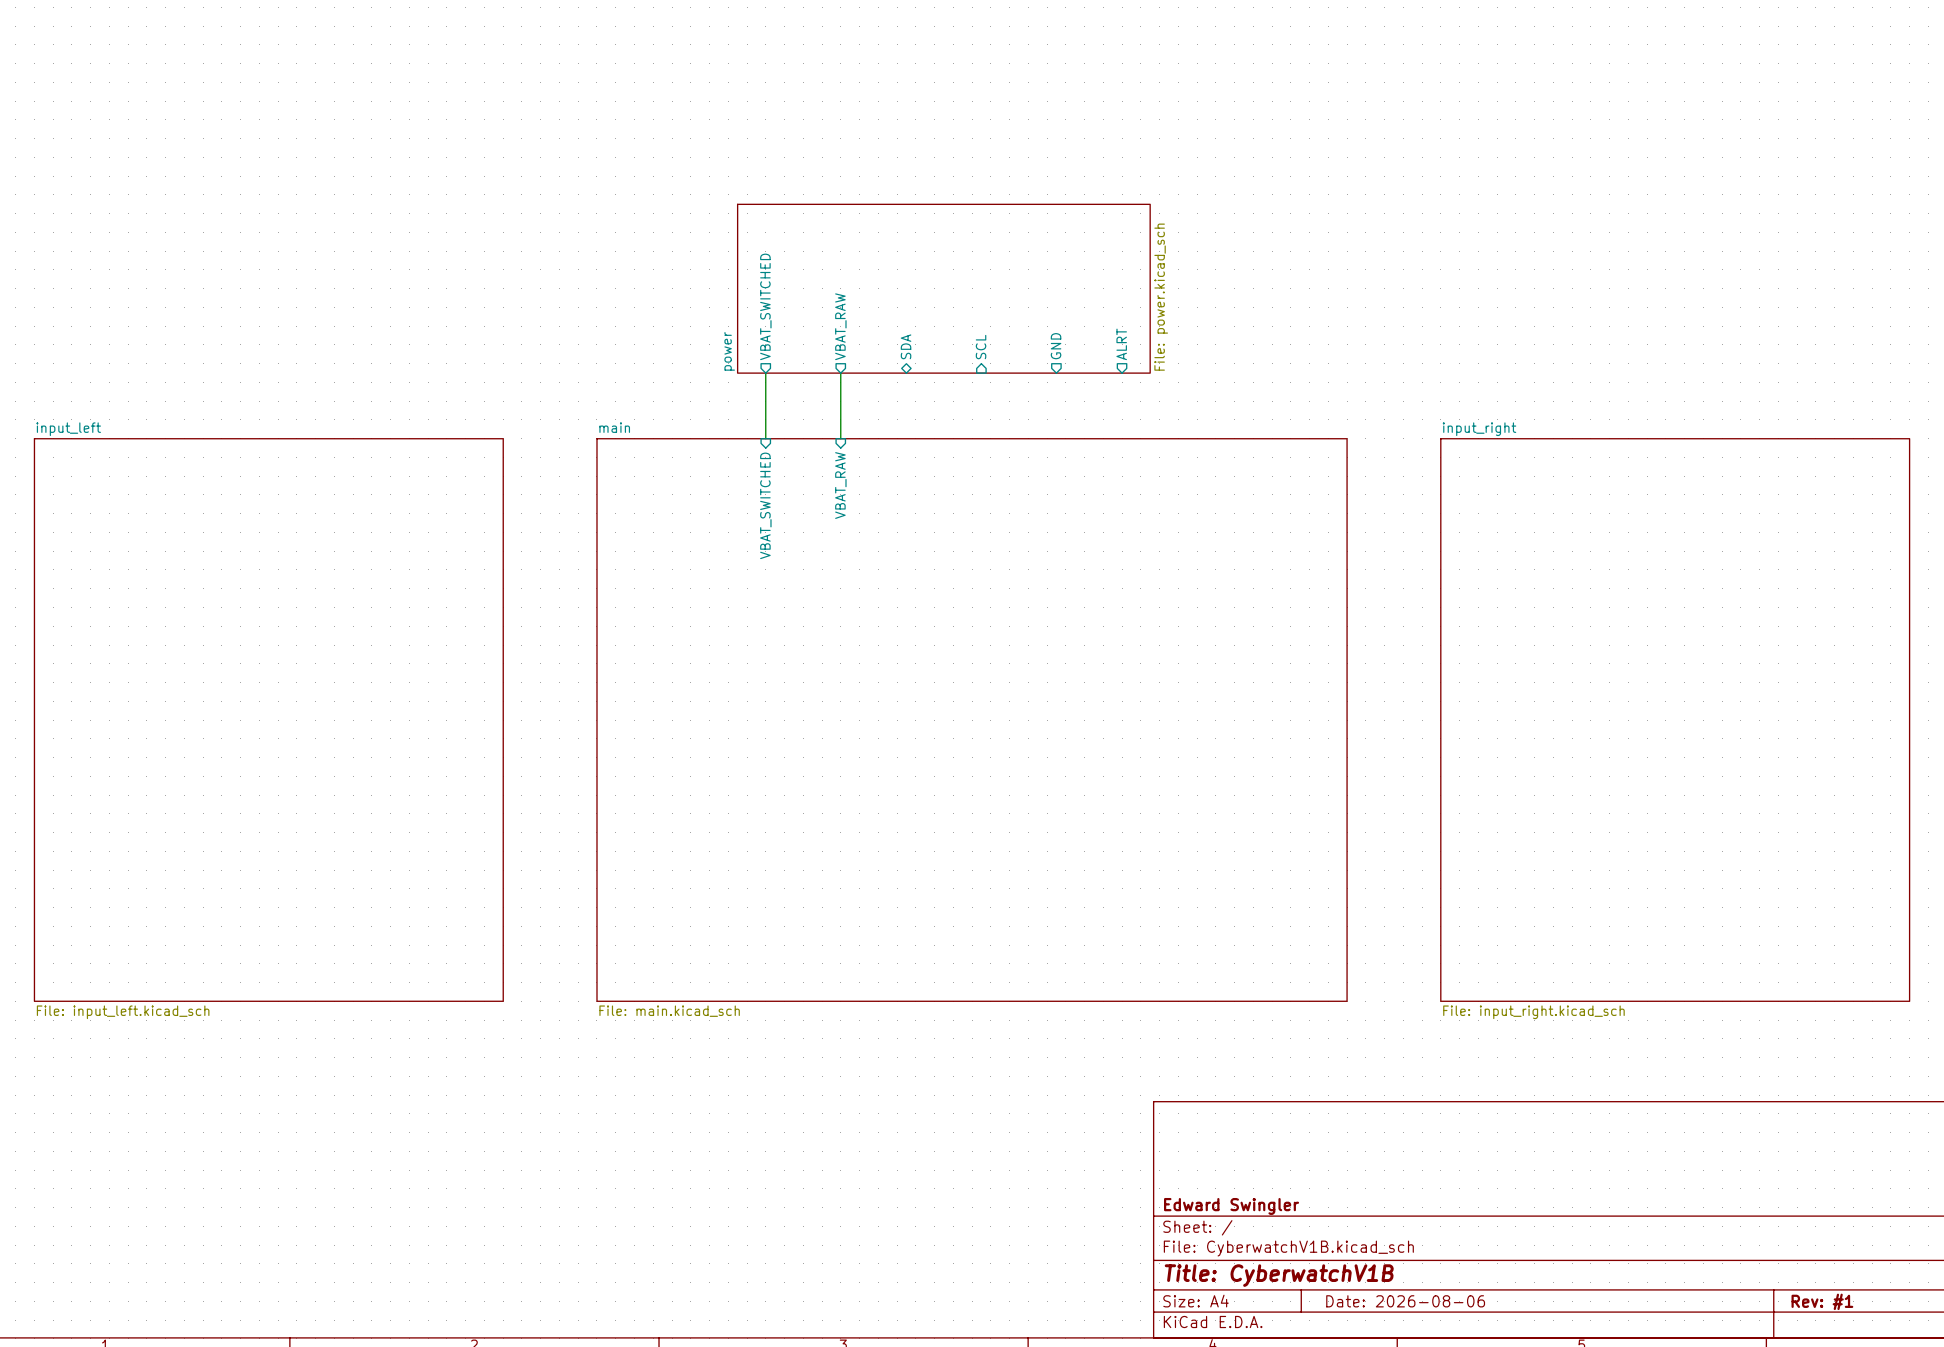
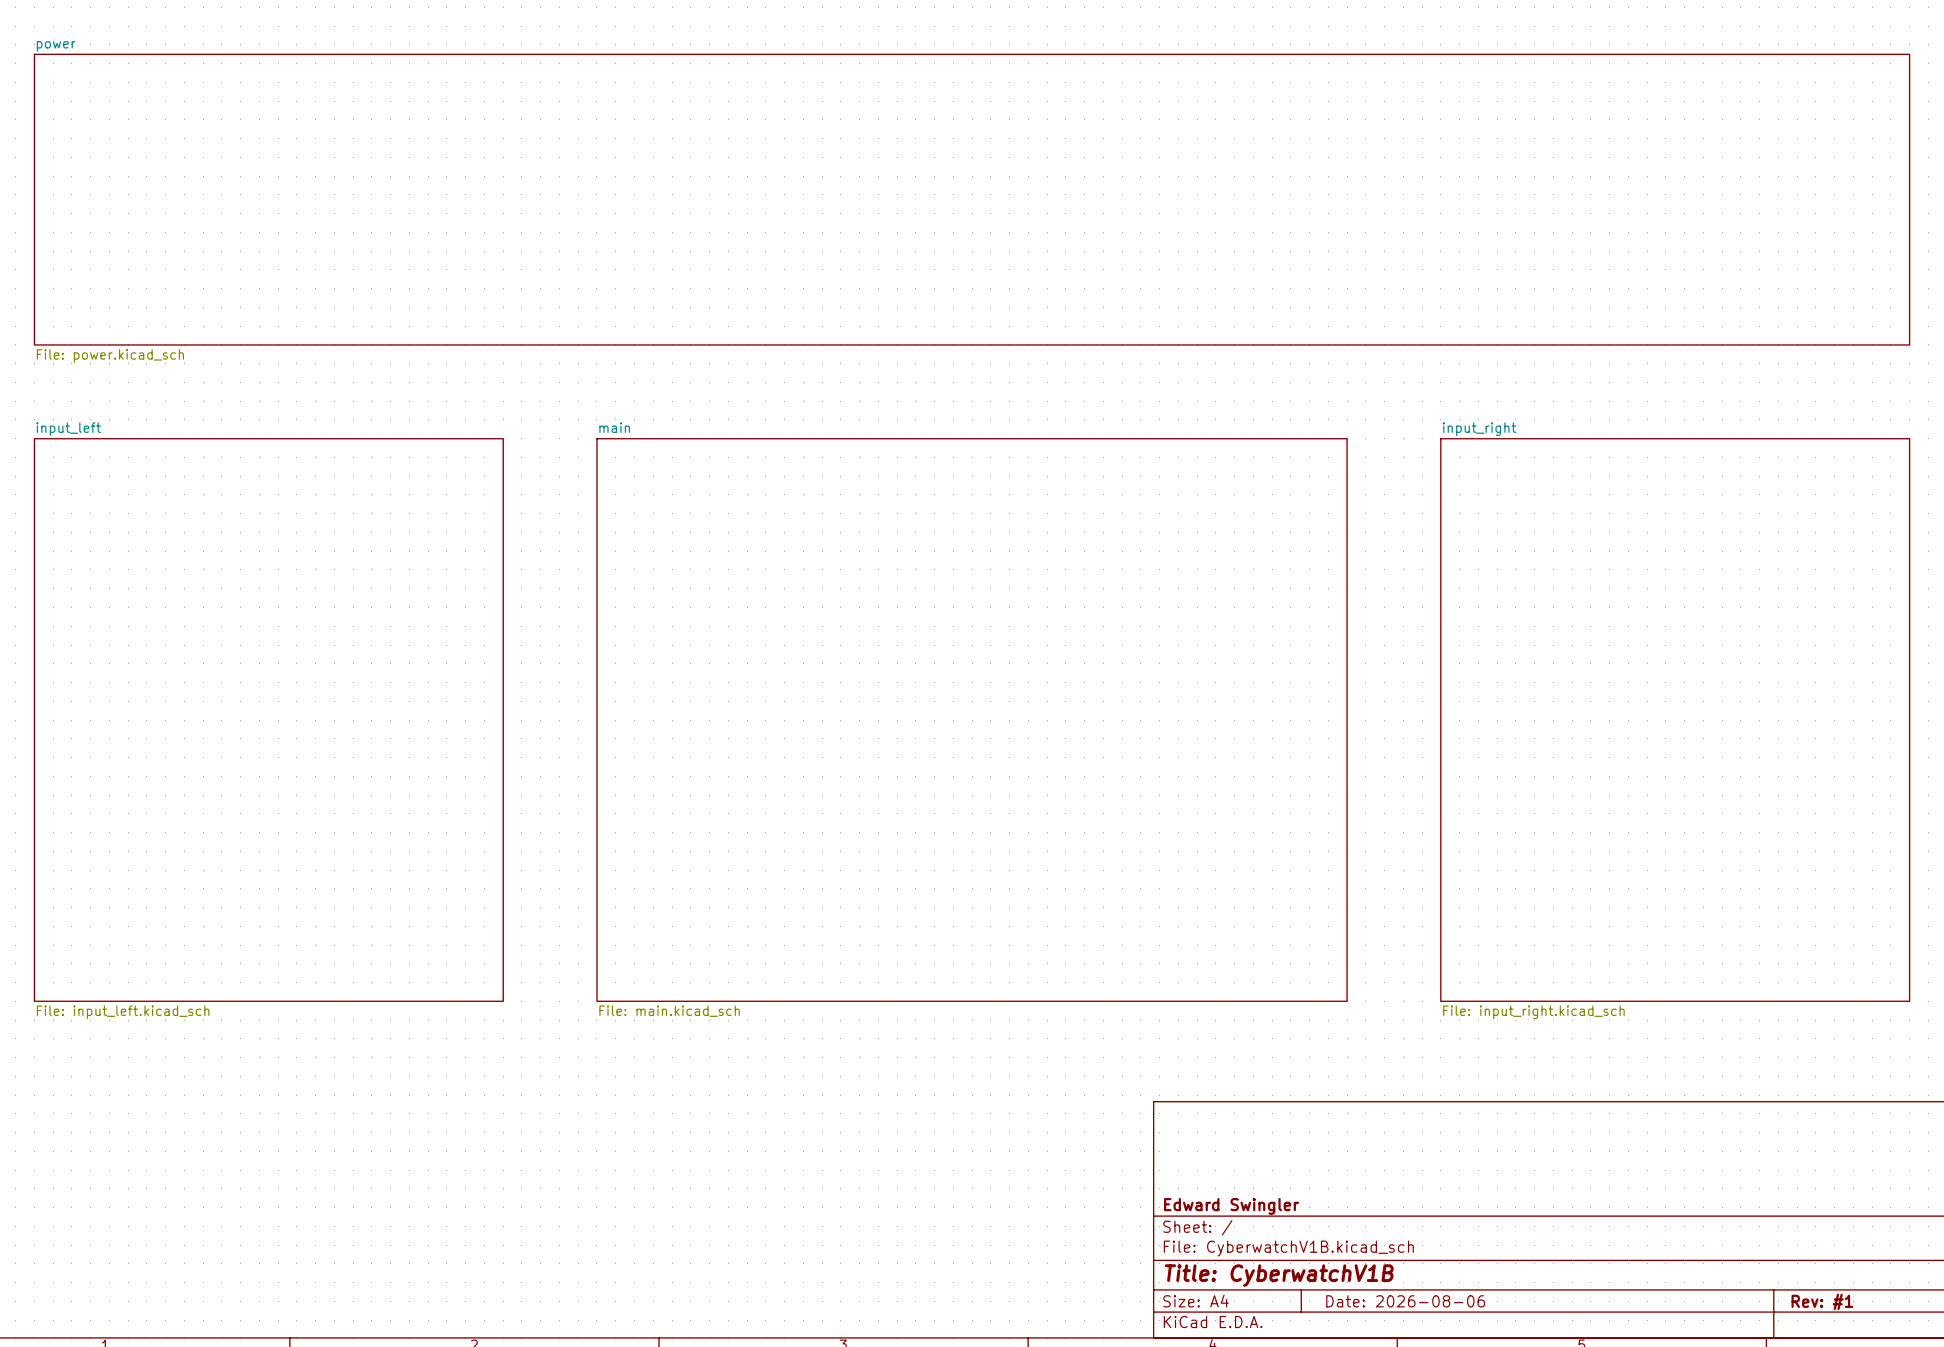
sheet power: none -> File: power.kicad_sch (972, 199)
sheet power: File: power.kicad_sch (943, 288) -> none
sheet pin: VBAT_SWITCHED (765, 306) -> none
sheet pin: VBAT_RAW (840, 326) -> none
sheet pin: ALRT (1121, 344) -> none
sheet pin: SDA (906, 346) -> none
sheet pin: GND (1056, 346) -> none
sheet pin: SCL (981, 347) -> none
wire: (765, 373) (765, 438) -> none
wire: (840, 373) (840, 438) -> none
sheet pin: VBAT_RAW (840, 485) -> none
sheet pin: VBAT_SWITCHED (765, 505) -> none

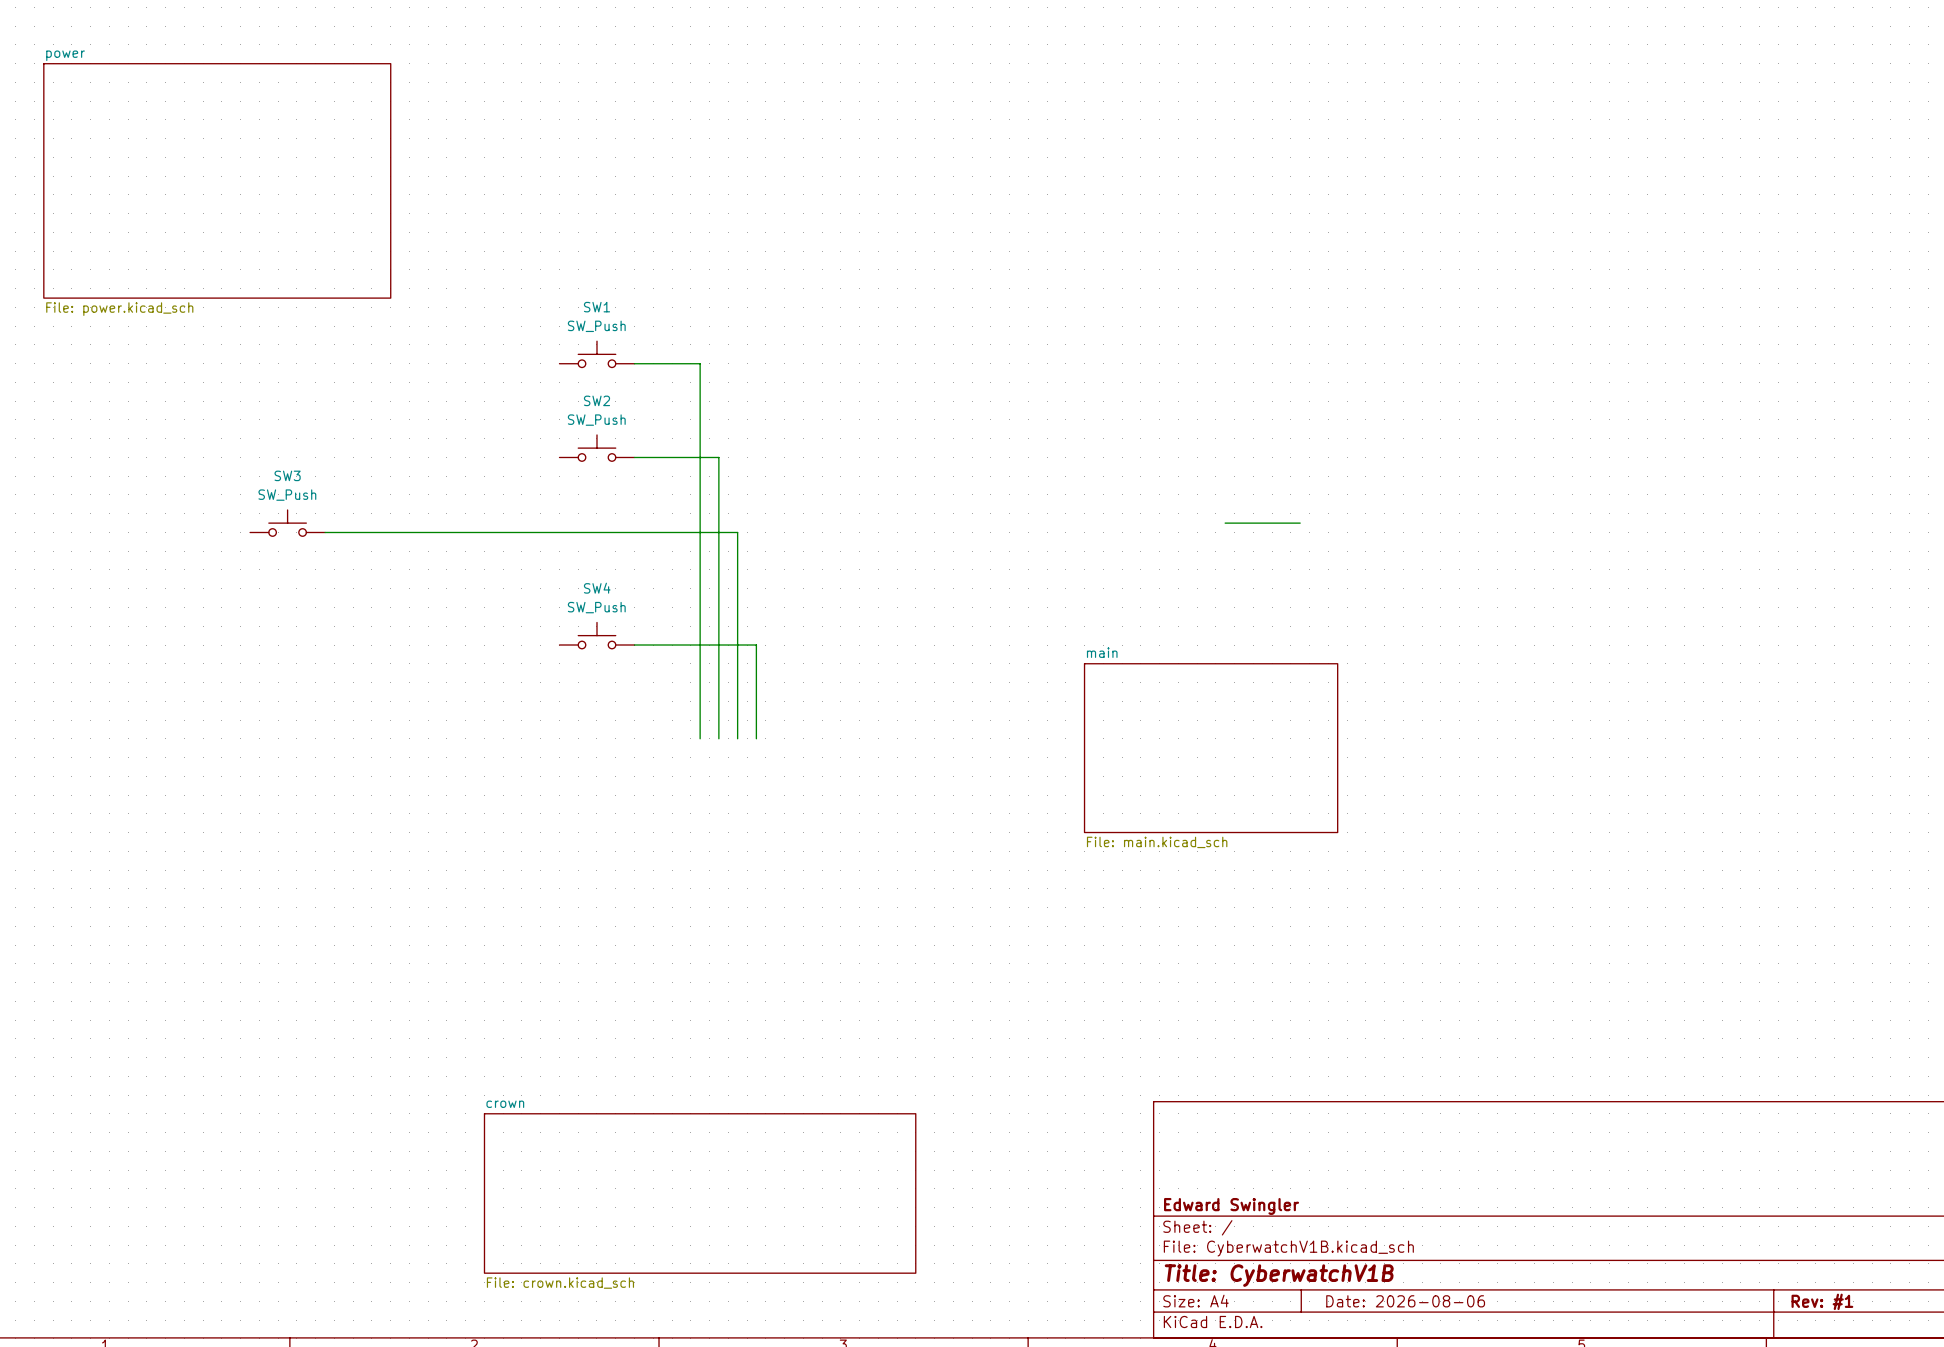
sheet power: none -> File: power.kicad_sch (217, 180)
sheet power: File: power.kicad_sch (972, 199) -> none
SW1: none -> SW_Push (596, 354)
wire: none -> (634, 363) (700, 363) (700, 738)
SW2: none -> SW_Push (596, 448)
wire: none -> (634, 457) (718, 457) (718, 738)
SW3: none -> SW_Push (287, 523)
wire: none -> (1225, 523) (1300, 523)
wire: none -> (325, 532) (737, 532) (737, 738)
SW4: none -> SW_Push (596, 635)
wire: none -> (634, 645) (756, 645) (756, 738)
sheet input_left: File: input_left.kicad_sch (268, 720) -> none
sheet main: File: main.kicad_sch (972, 720) -> none
sheet input_right: File: input_right.kicad_sch (1675, 720) -> none
sheet main: none -> File: main.kicad_sch (1211, 748)
sheet crown: none -> File: crown.kicad_sch (700, 1193)

